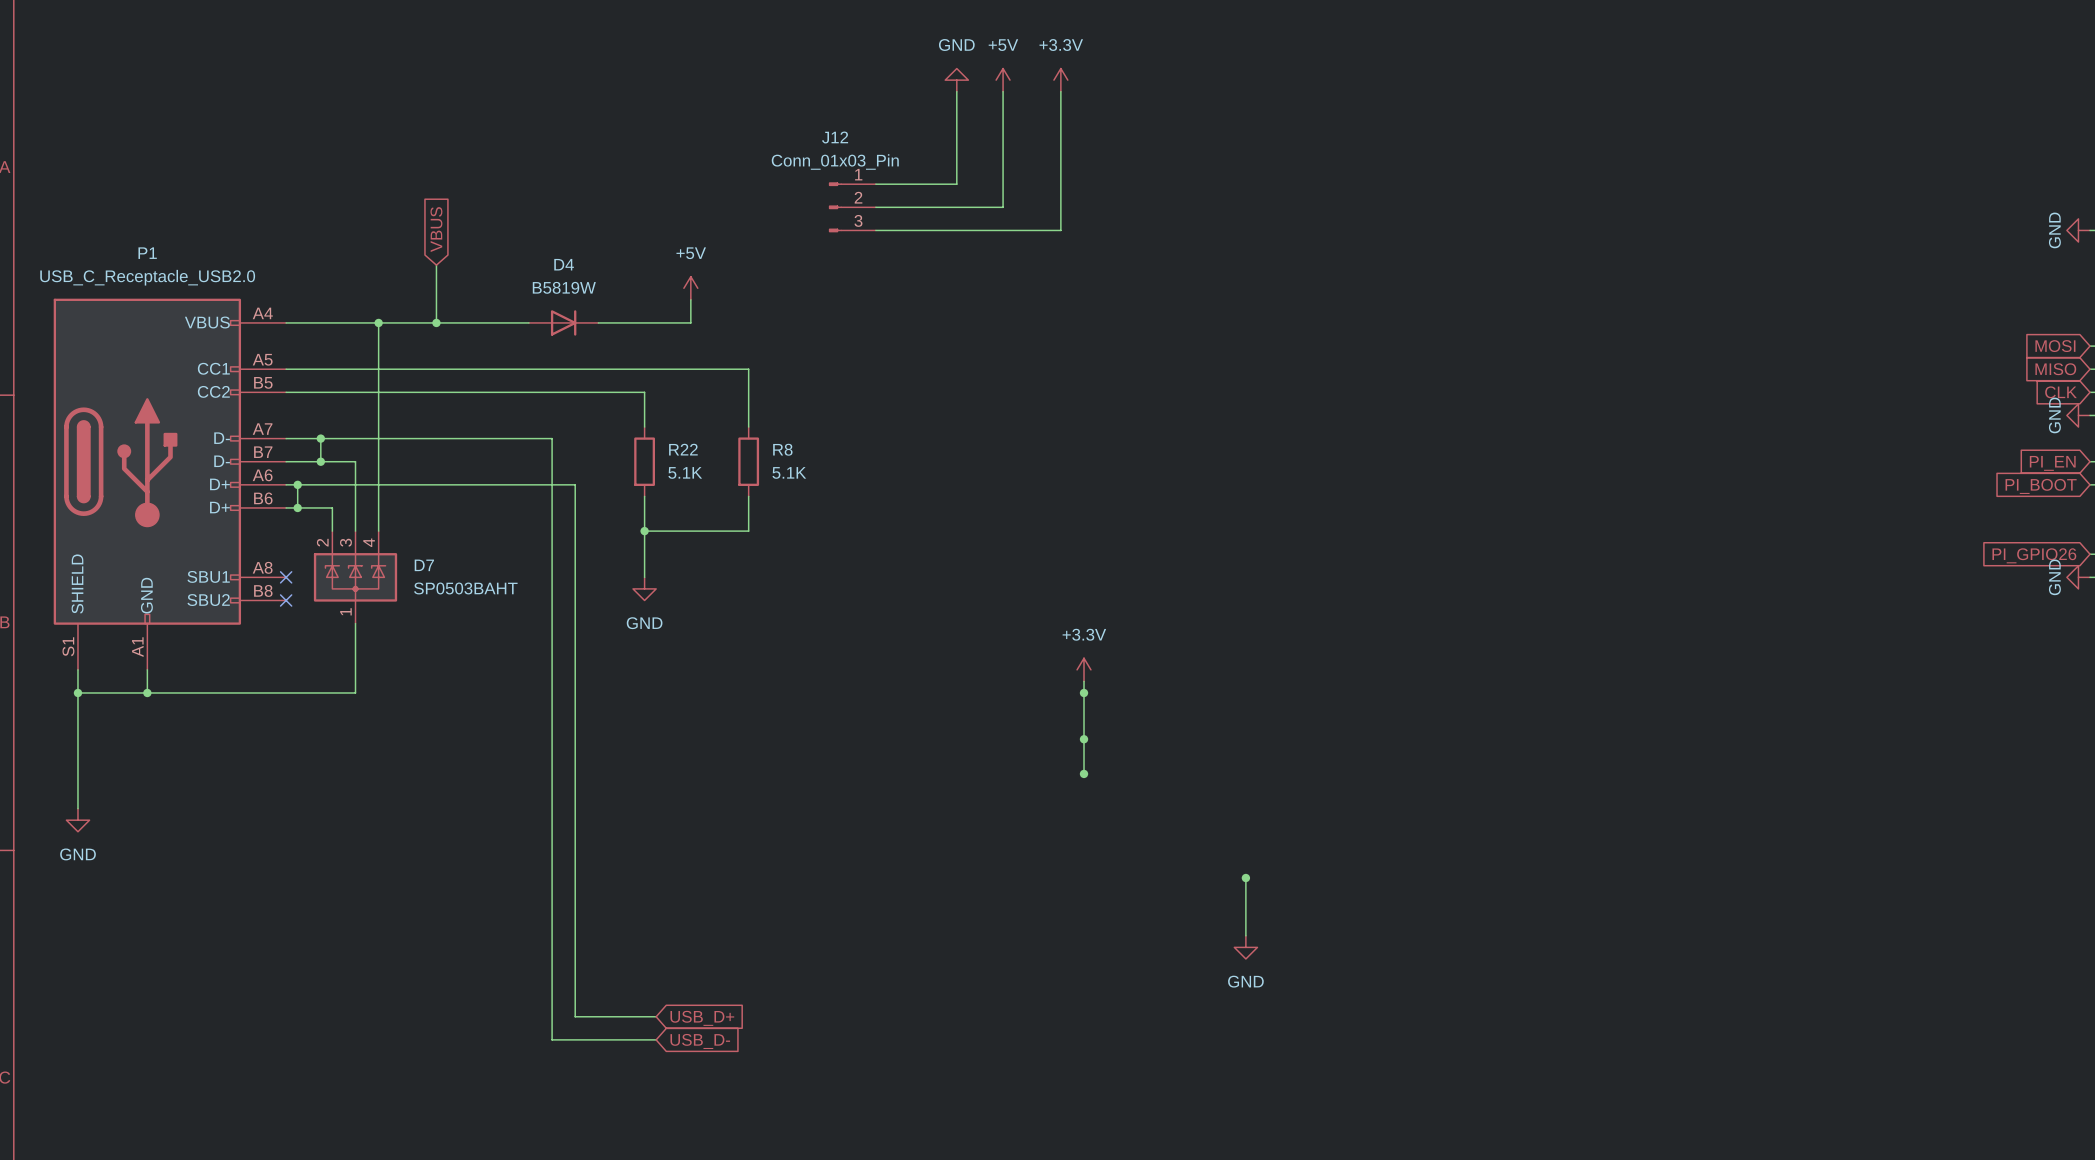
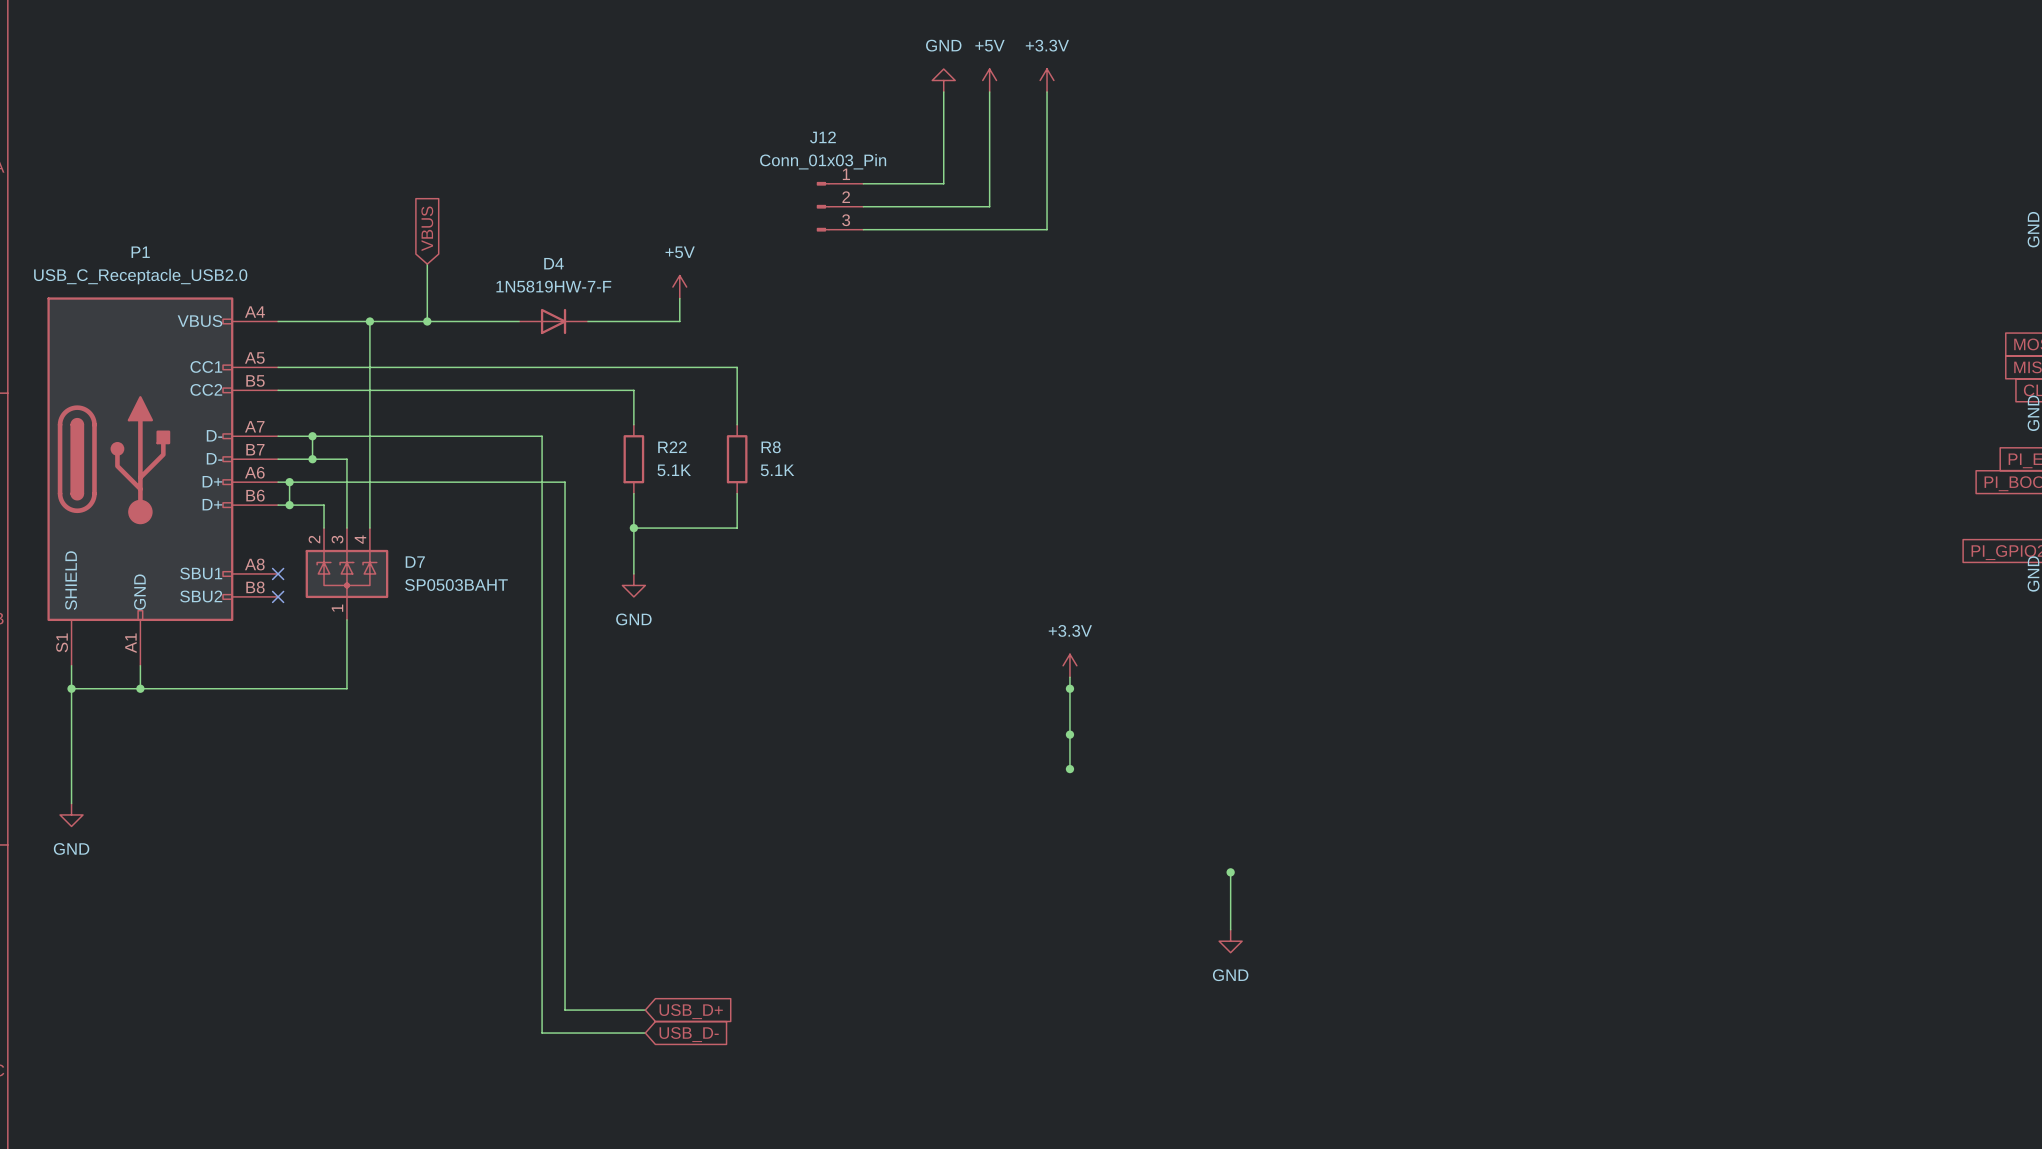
D4 value: B5819W (564, 287) -> 1N5819HW-7-F (553, 286)

